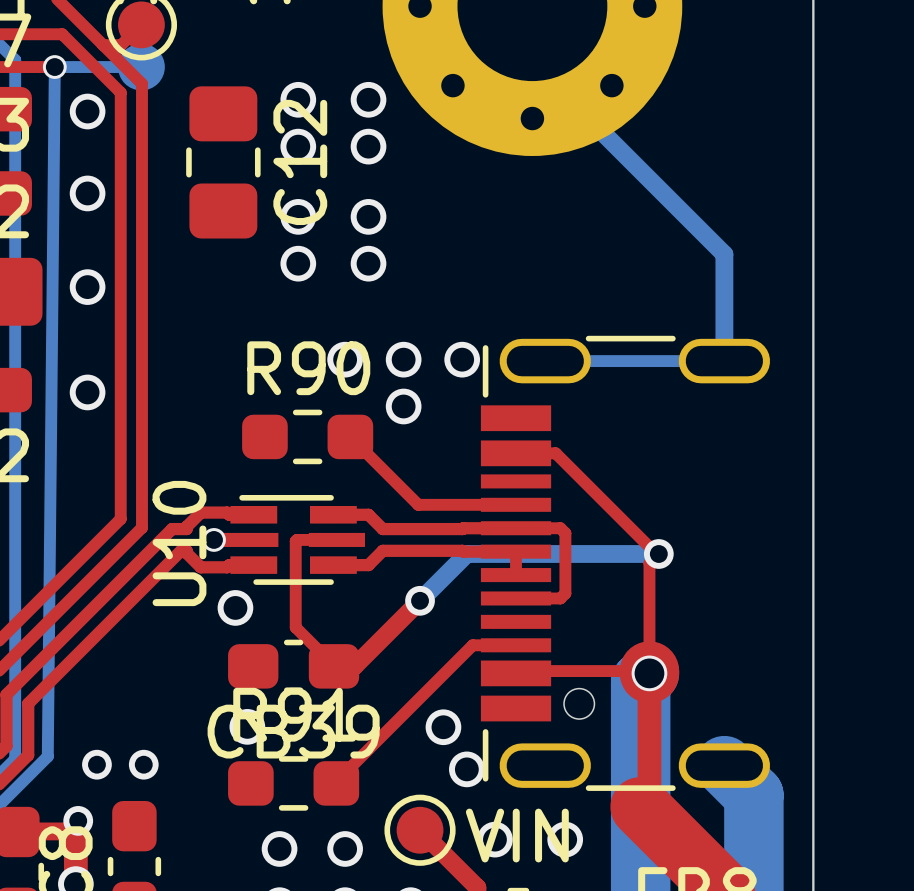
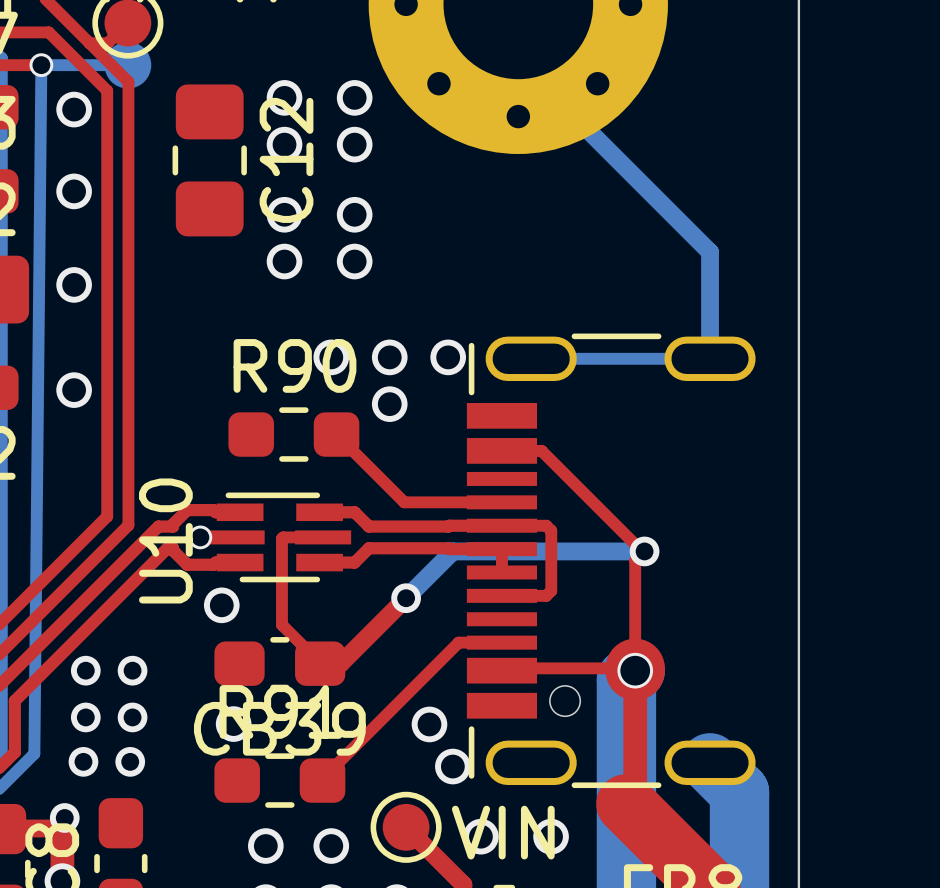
via: none -> (85, 670)
via: none -> (132, 670)
via: none -> (85, 717)
via: none -> (132, 717)

